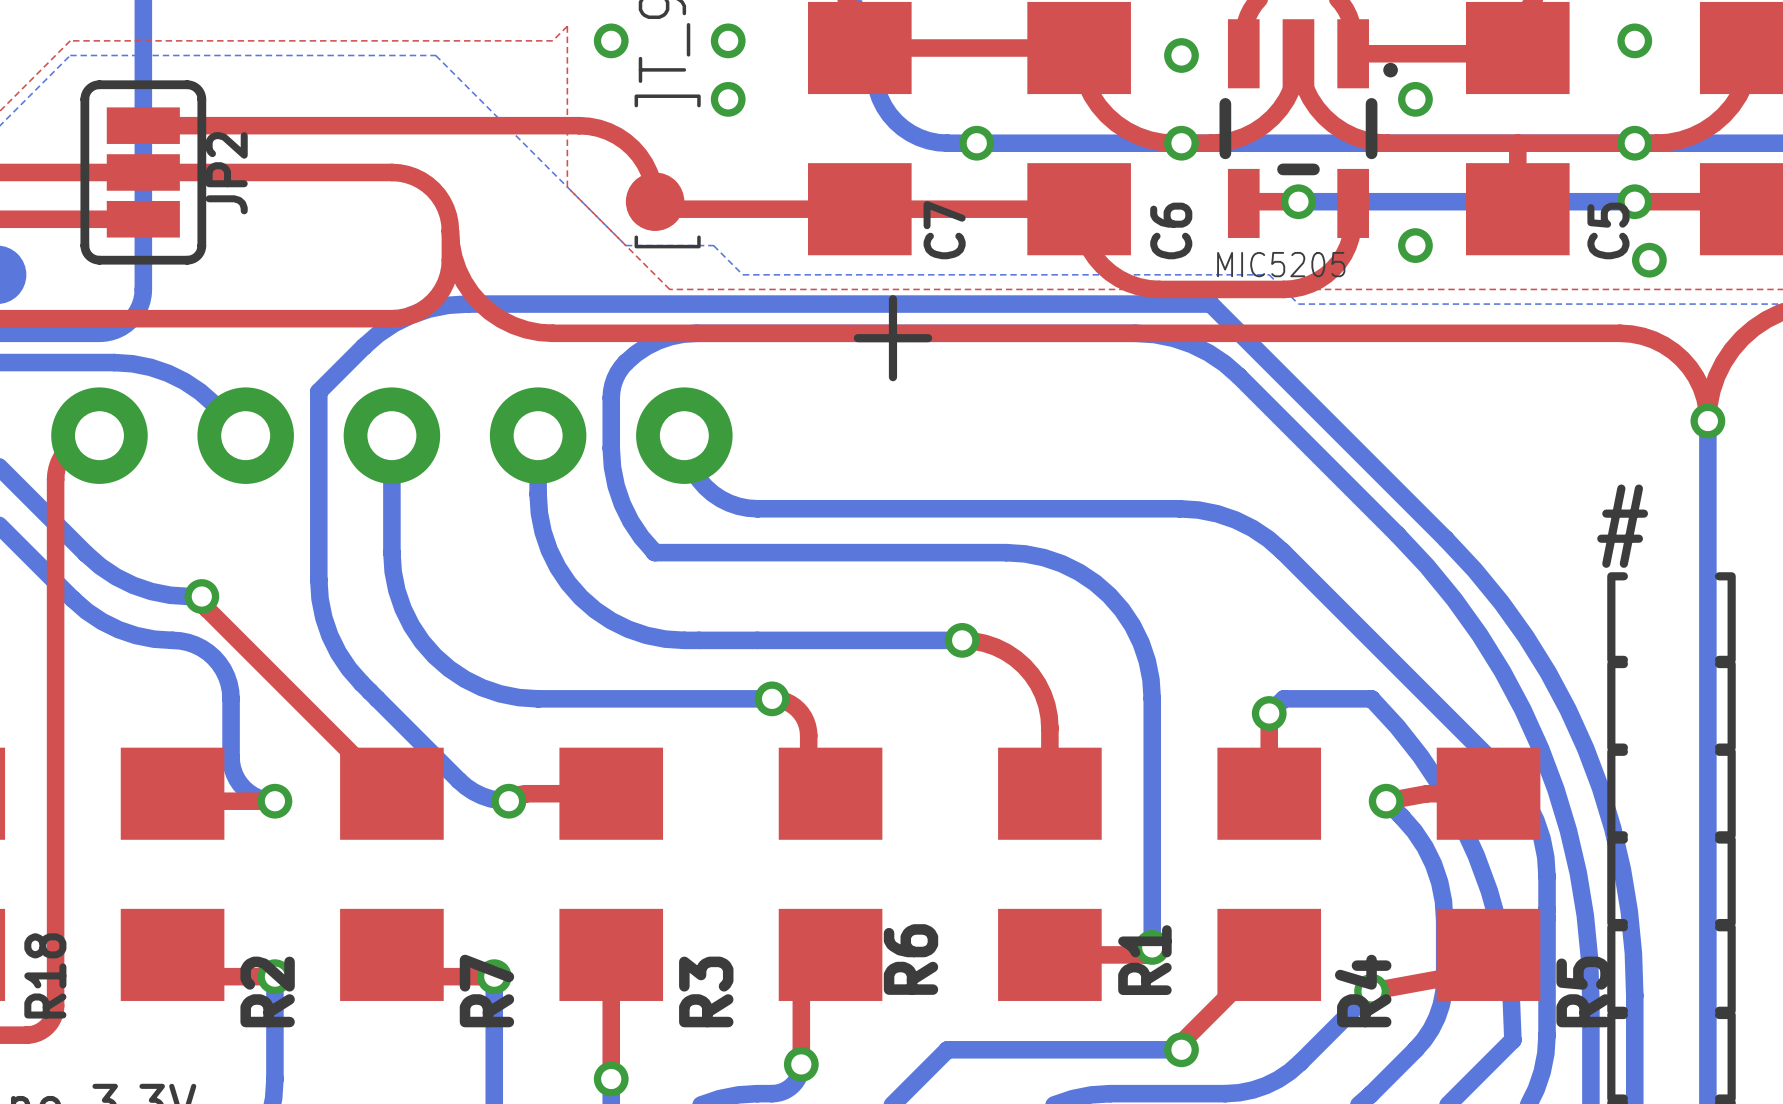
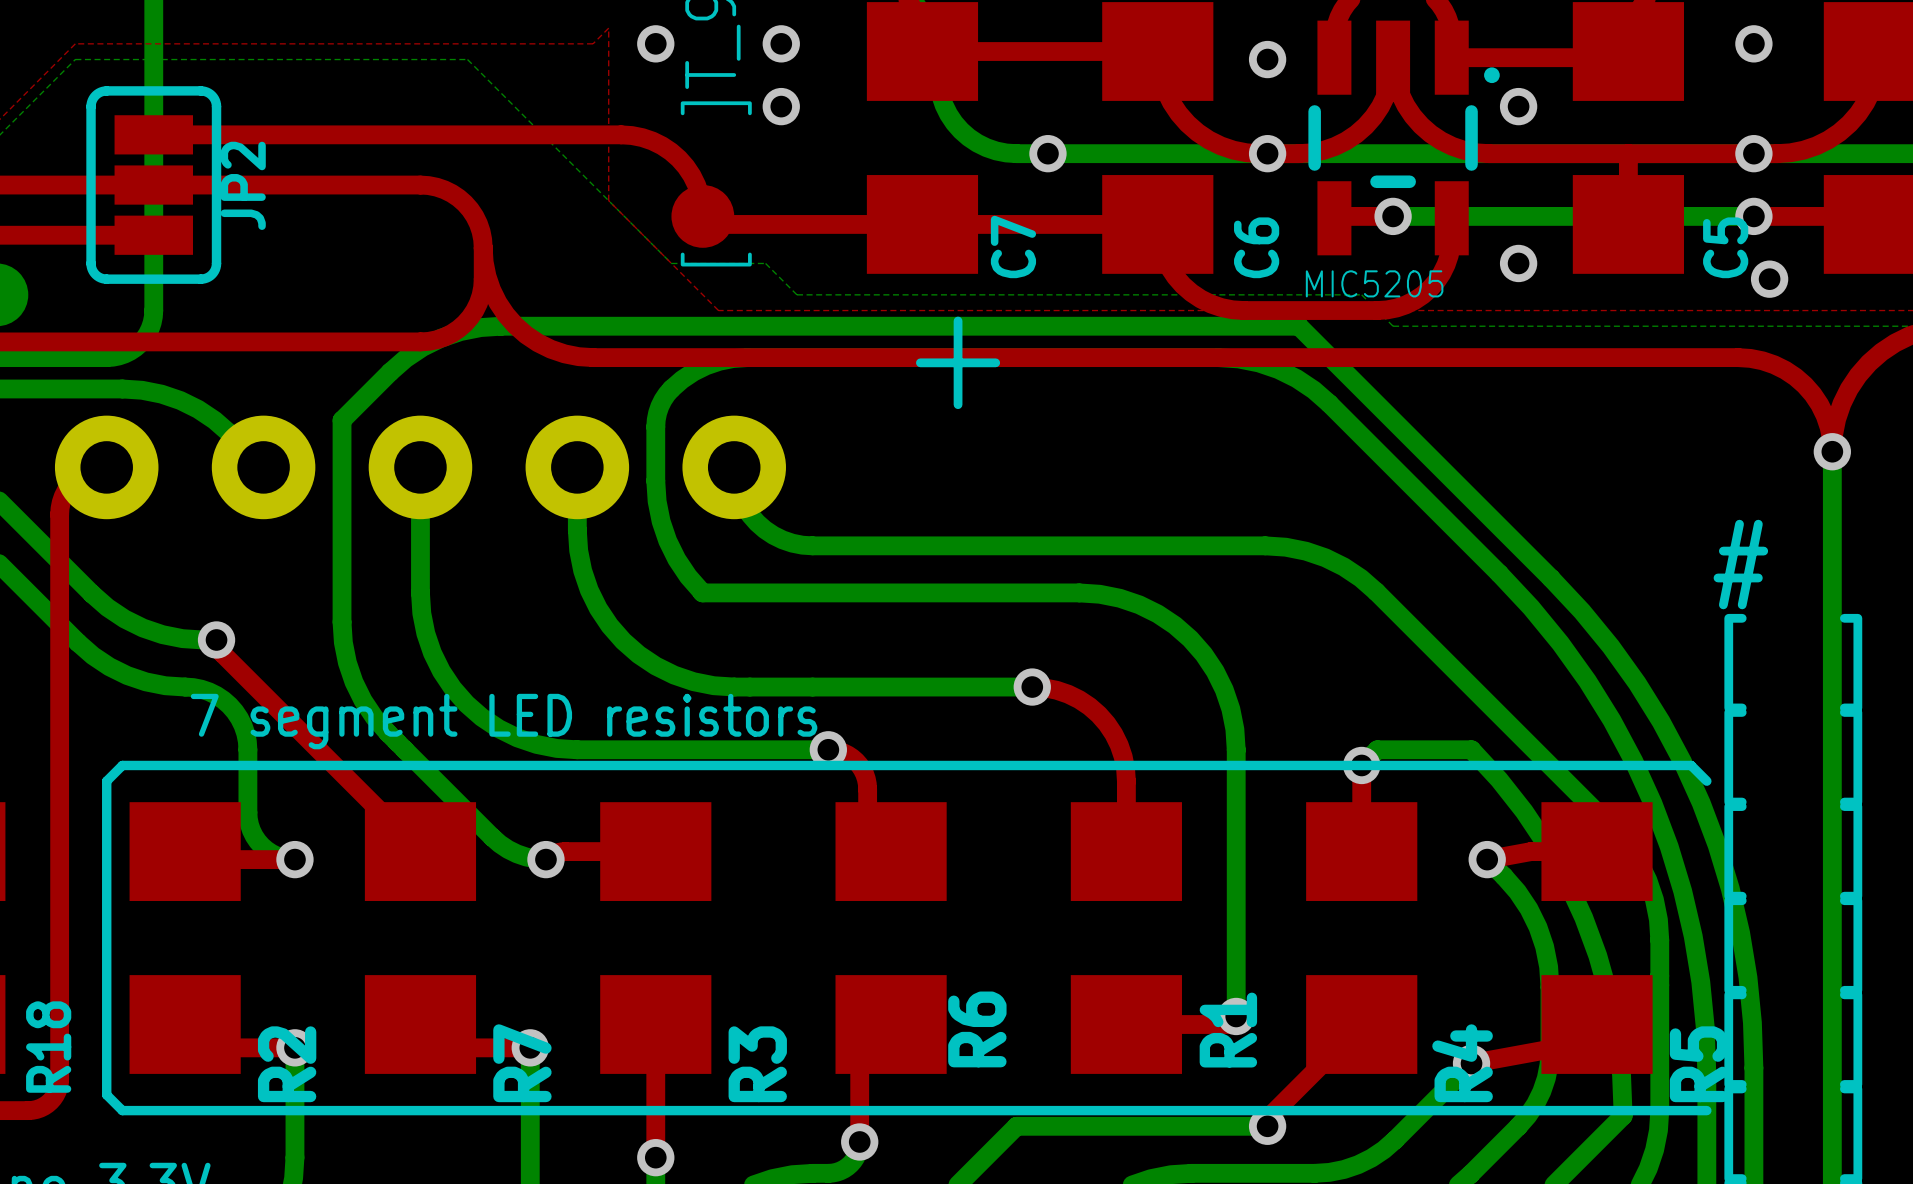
text: none -> 7 segment LED resistors (504, 721)
line: none -> (1706, 781) (1691, 765) (122, 765) (106, 781) (106, 1094) (122, 1110) (1706, 1110)

